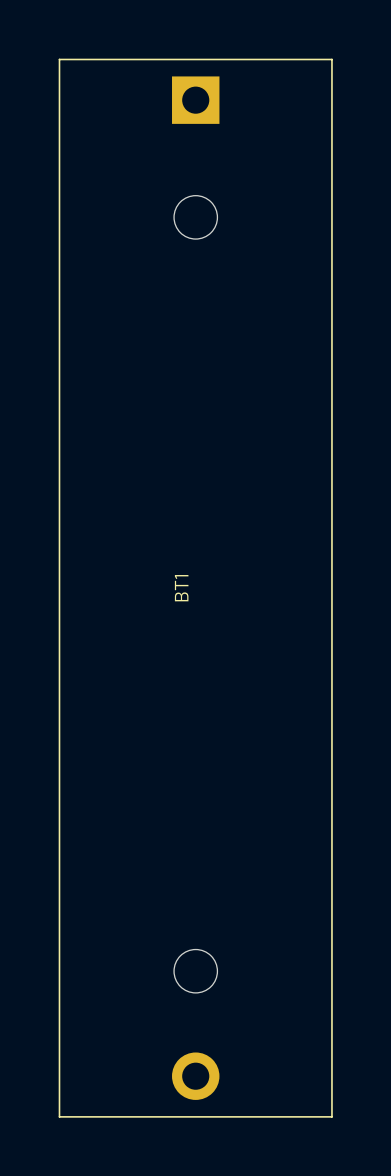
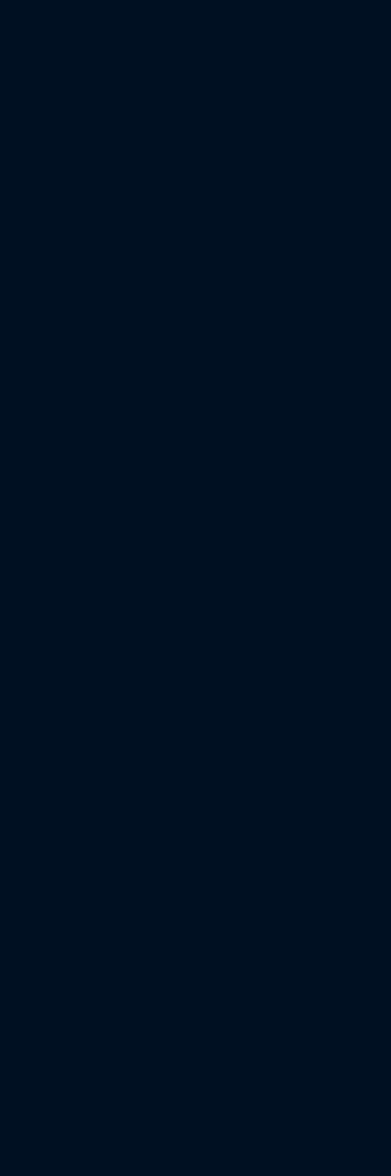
BT1: (195, 588) -> none

